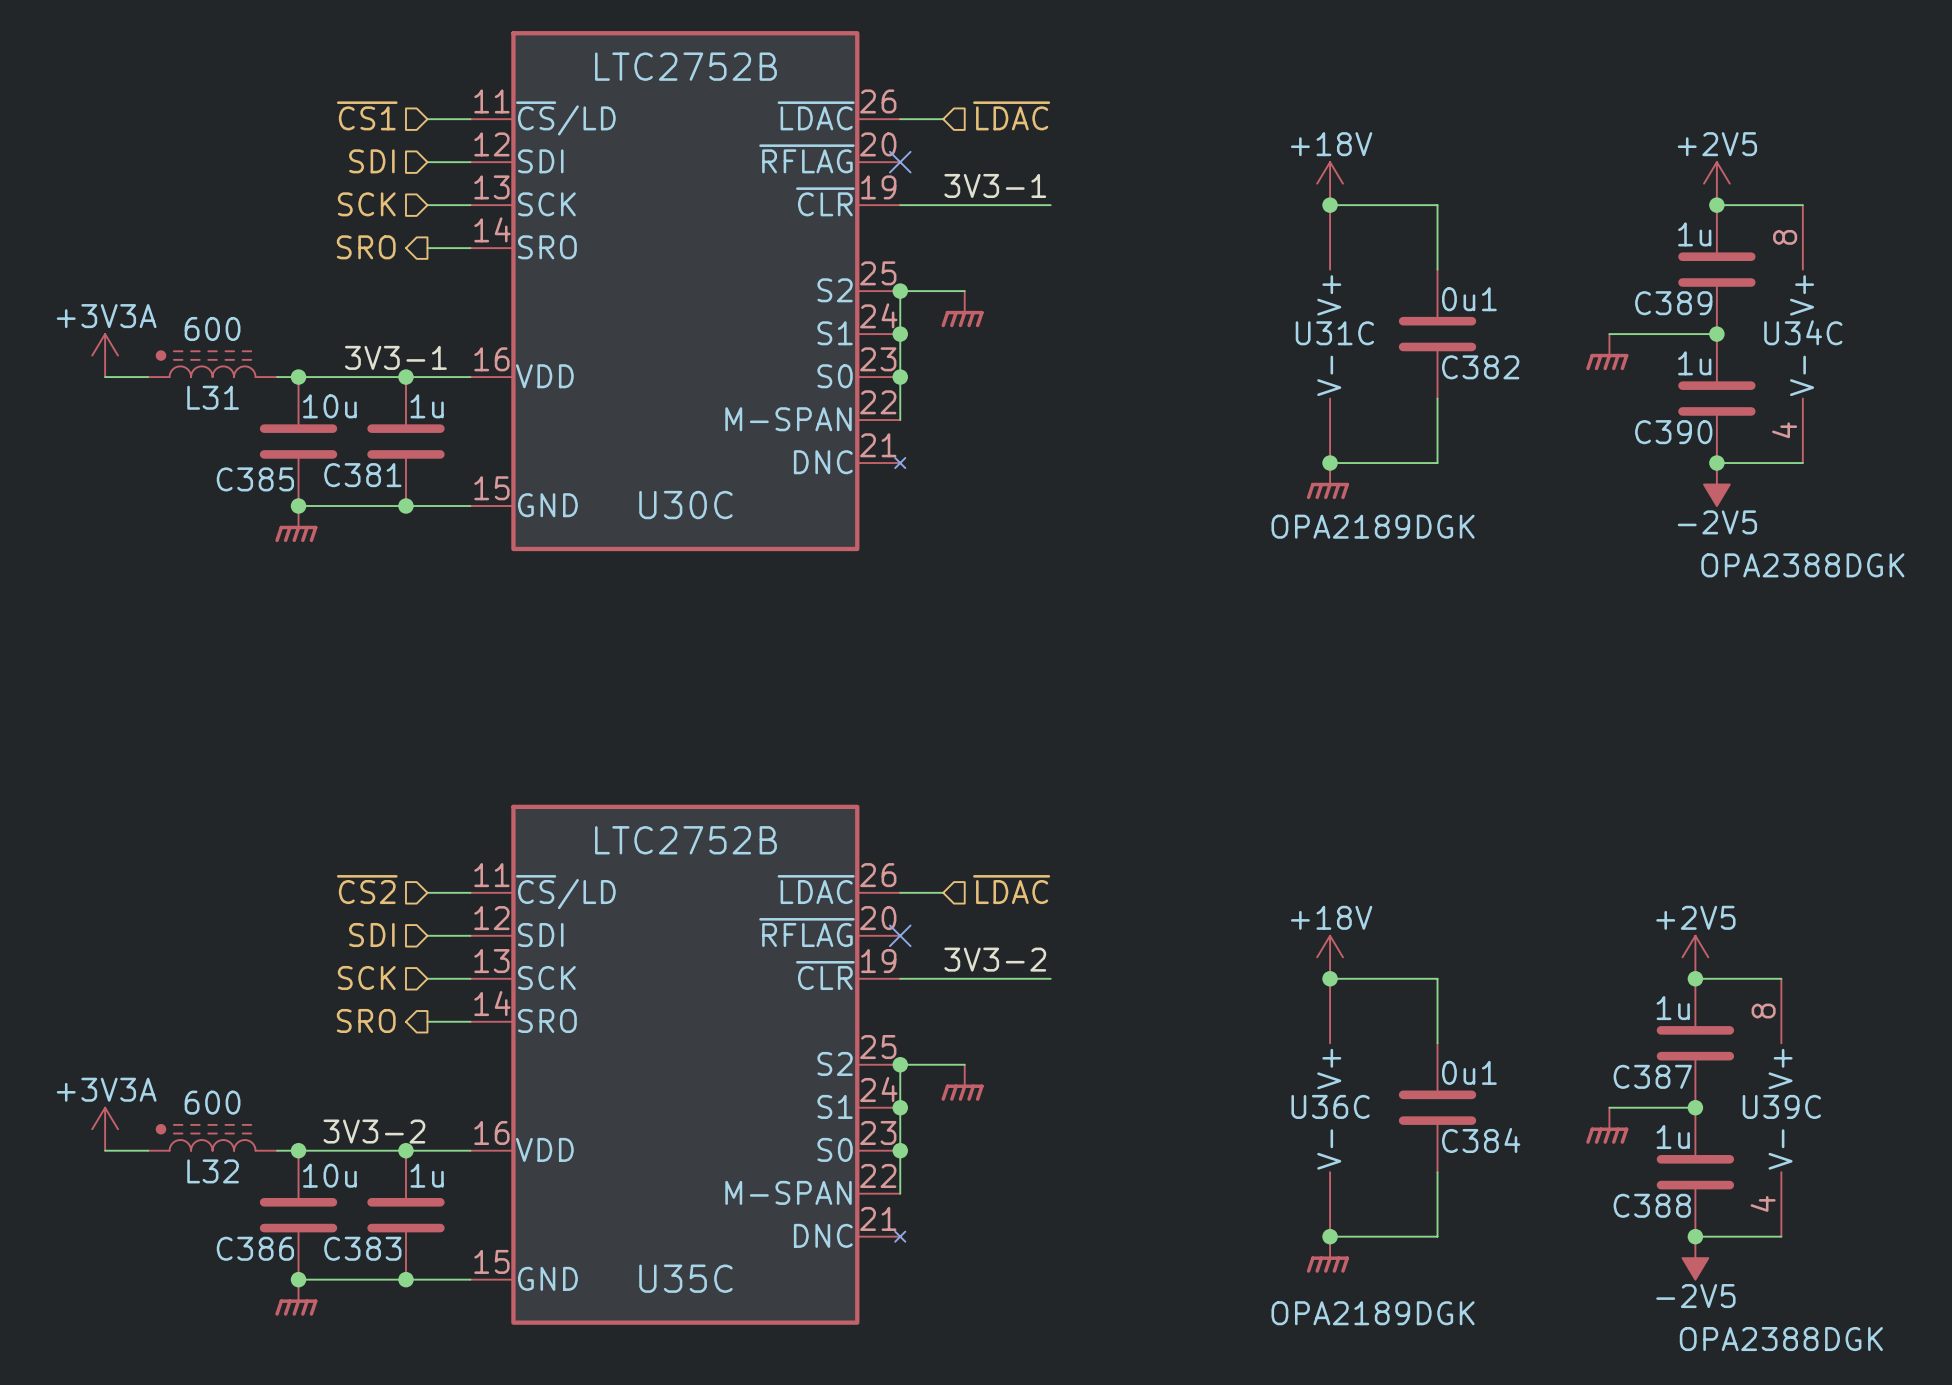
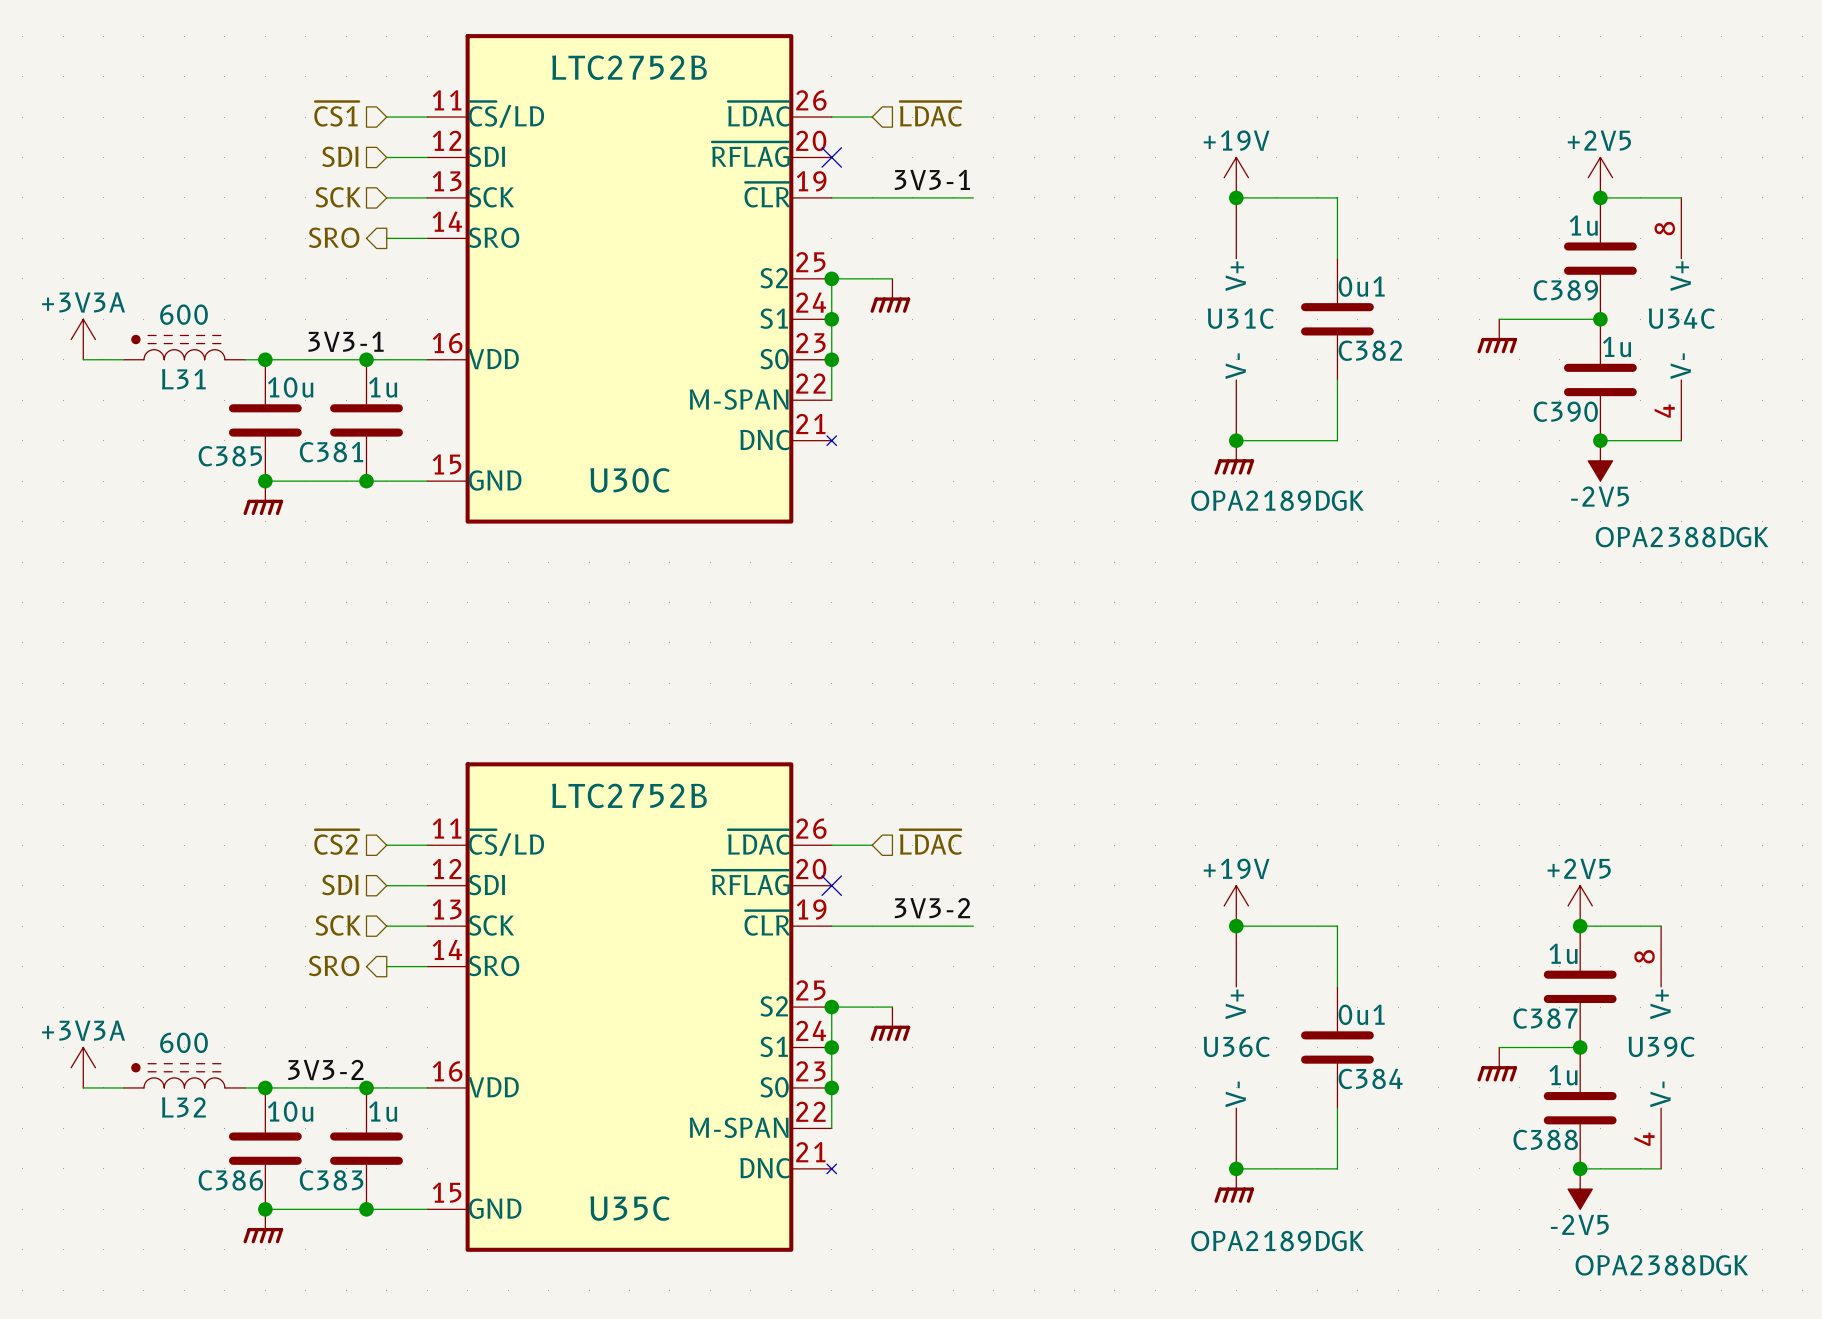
power symbol: +18V (1330, 183) -> +19V (1236, 177)
C390 value position: 1u (1694, 363) -> 1u (1617, 346)
power symbol: +18V (1330, 957) -> +19V (1236, 905)

